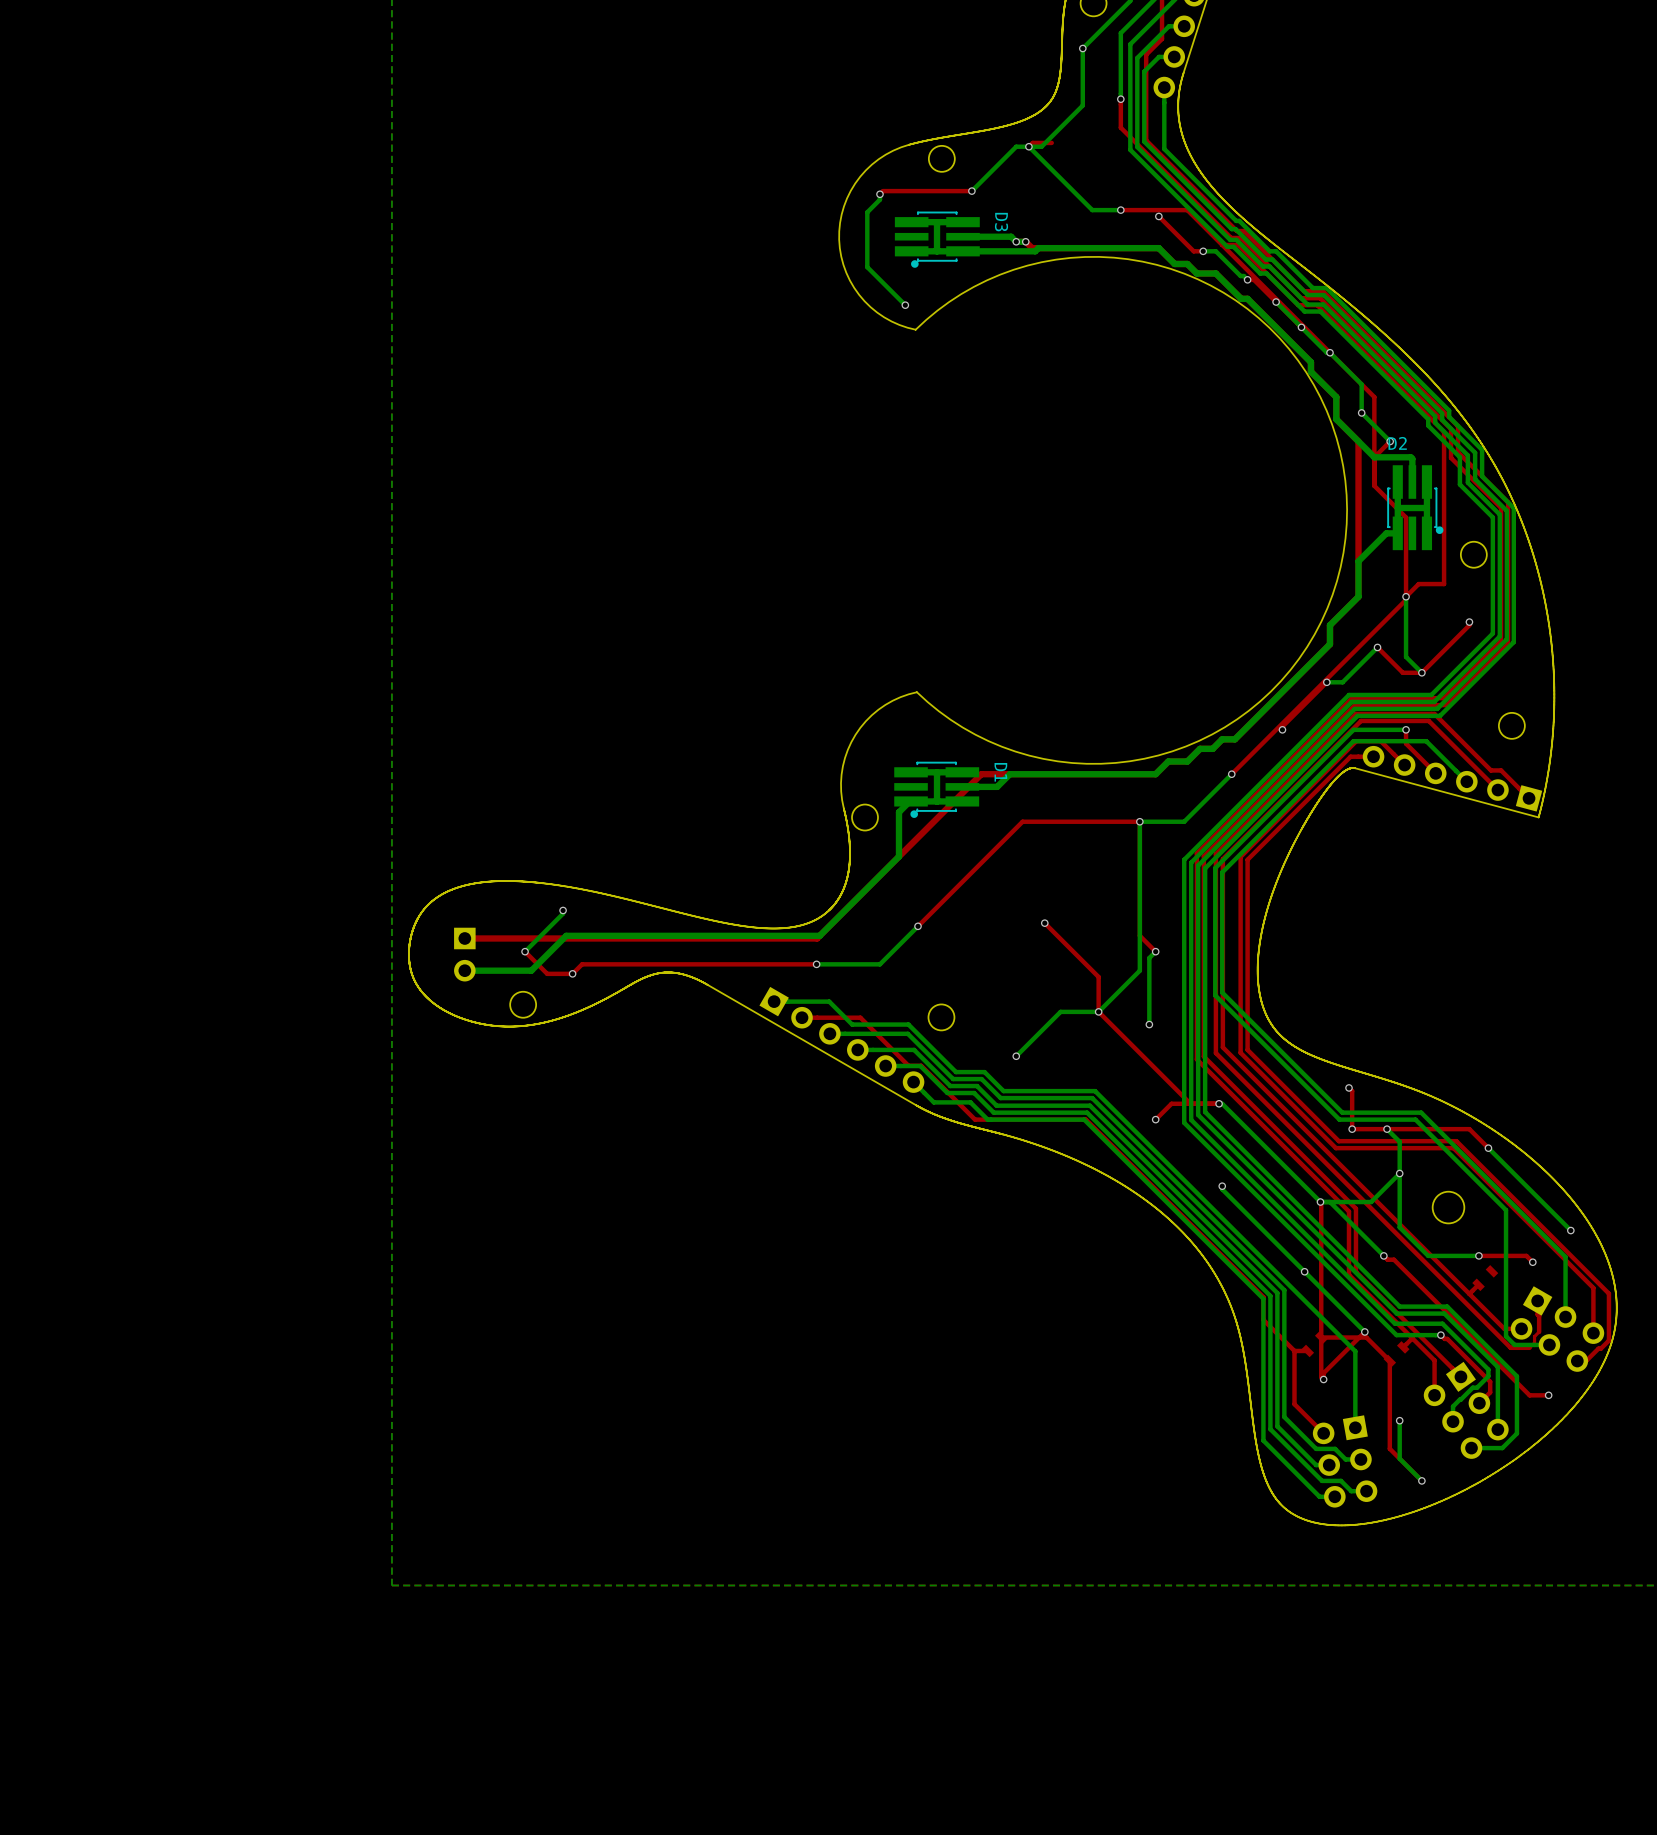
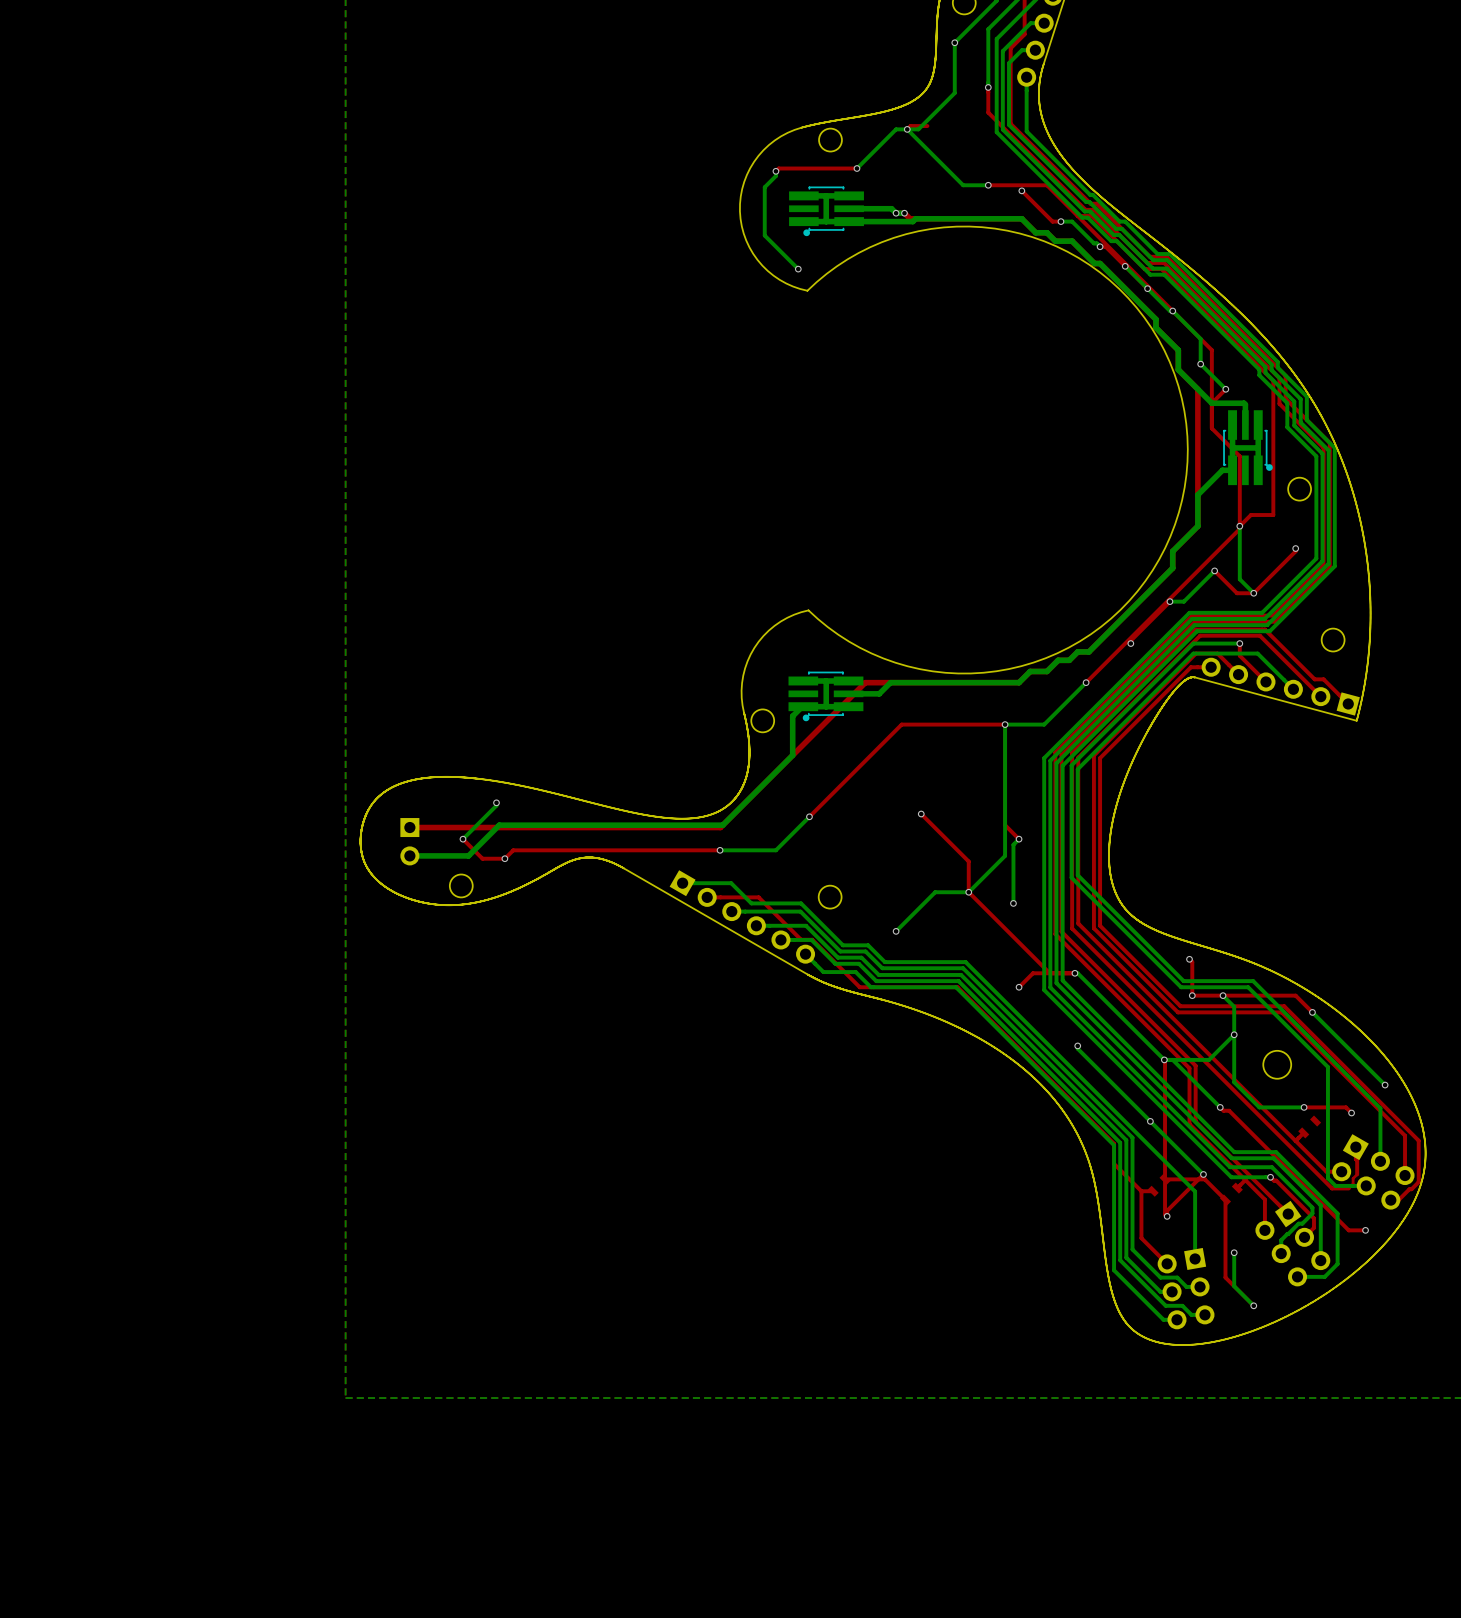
D3 name: D3 (1001, 222) -> none
D2 name: D2 (1397, 443) -> none
D1 name: D1 (1000, 772) -> none

